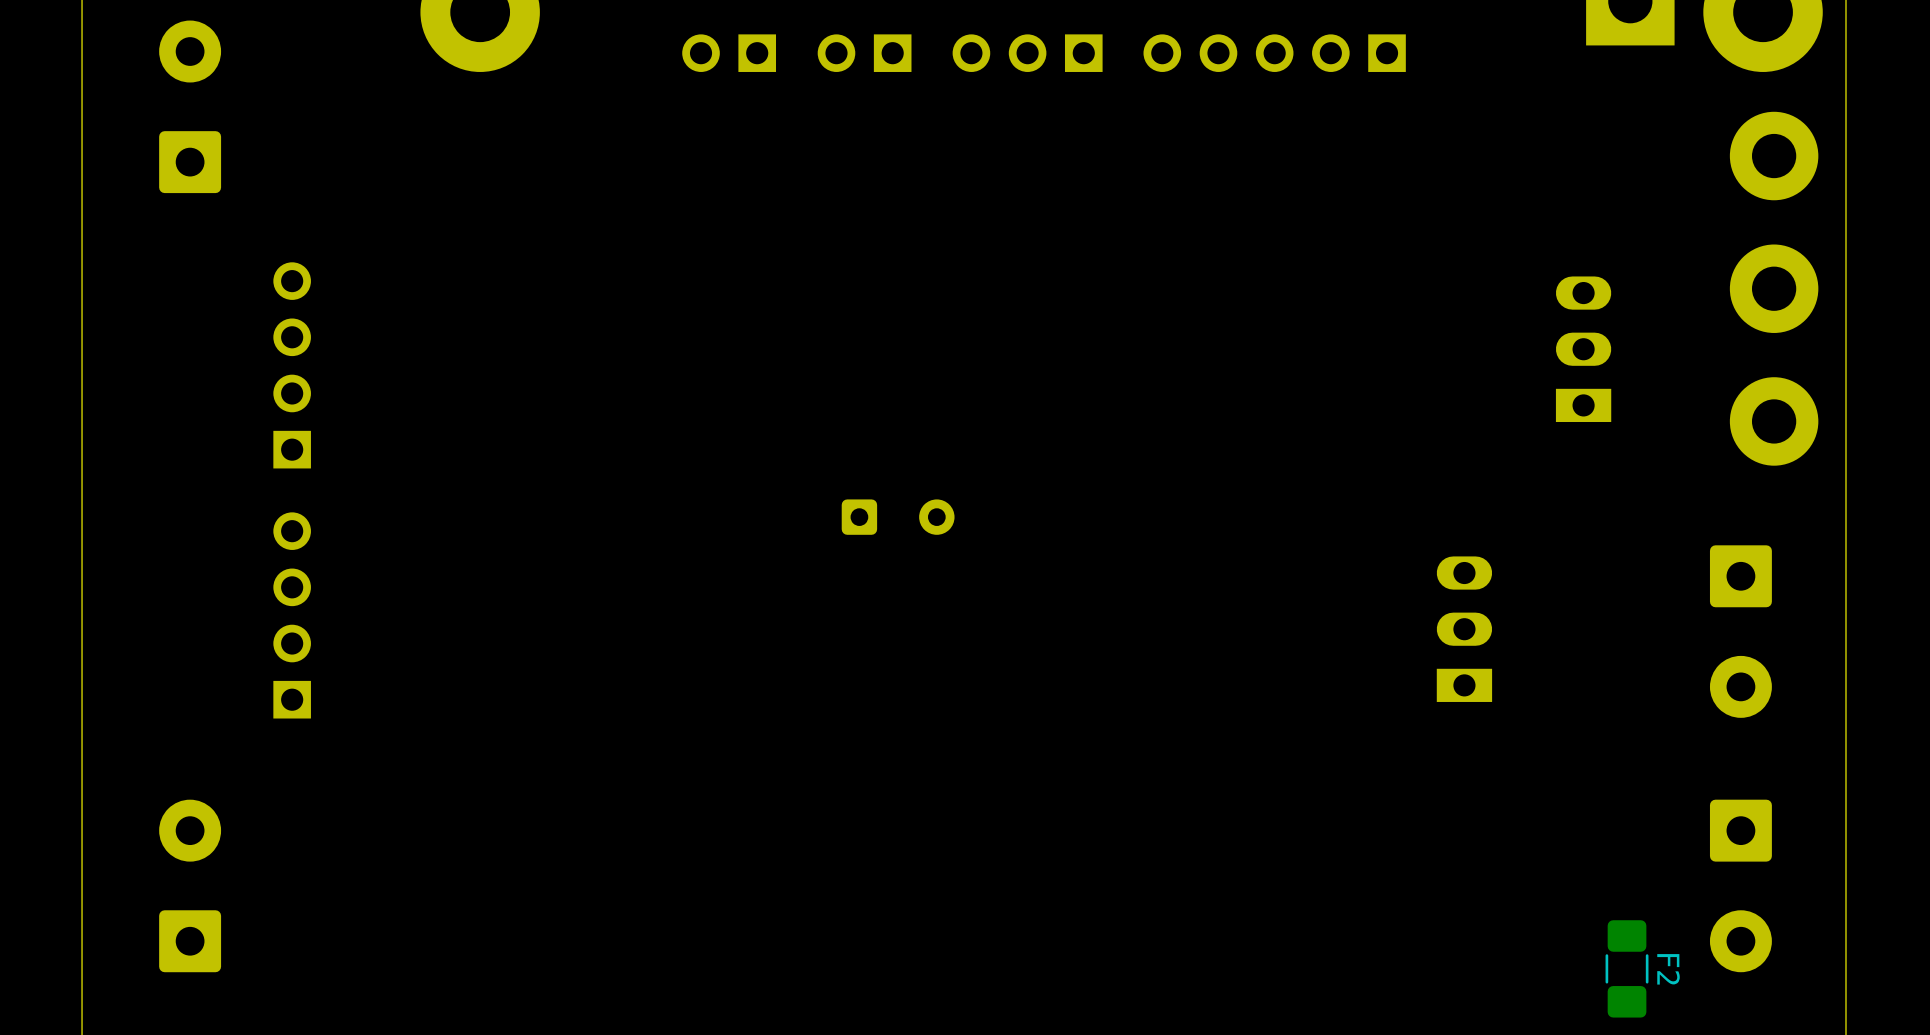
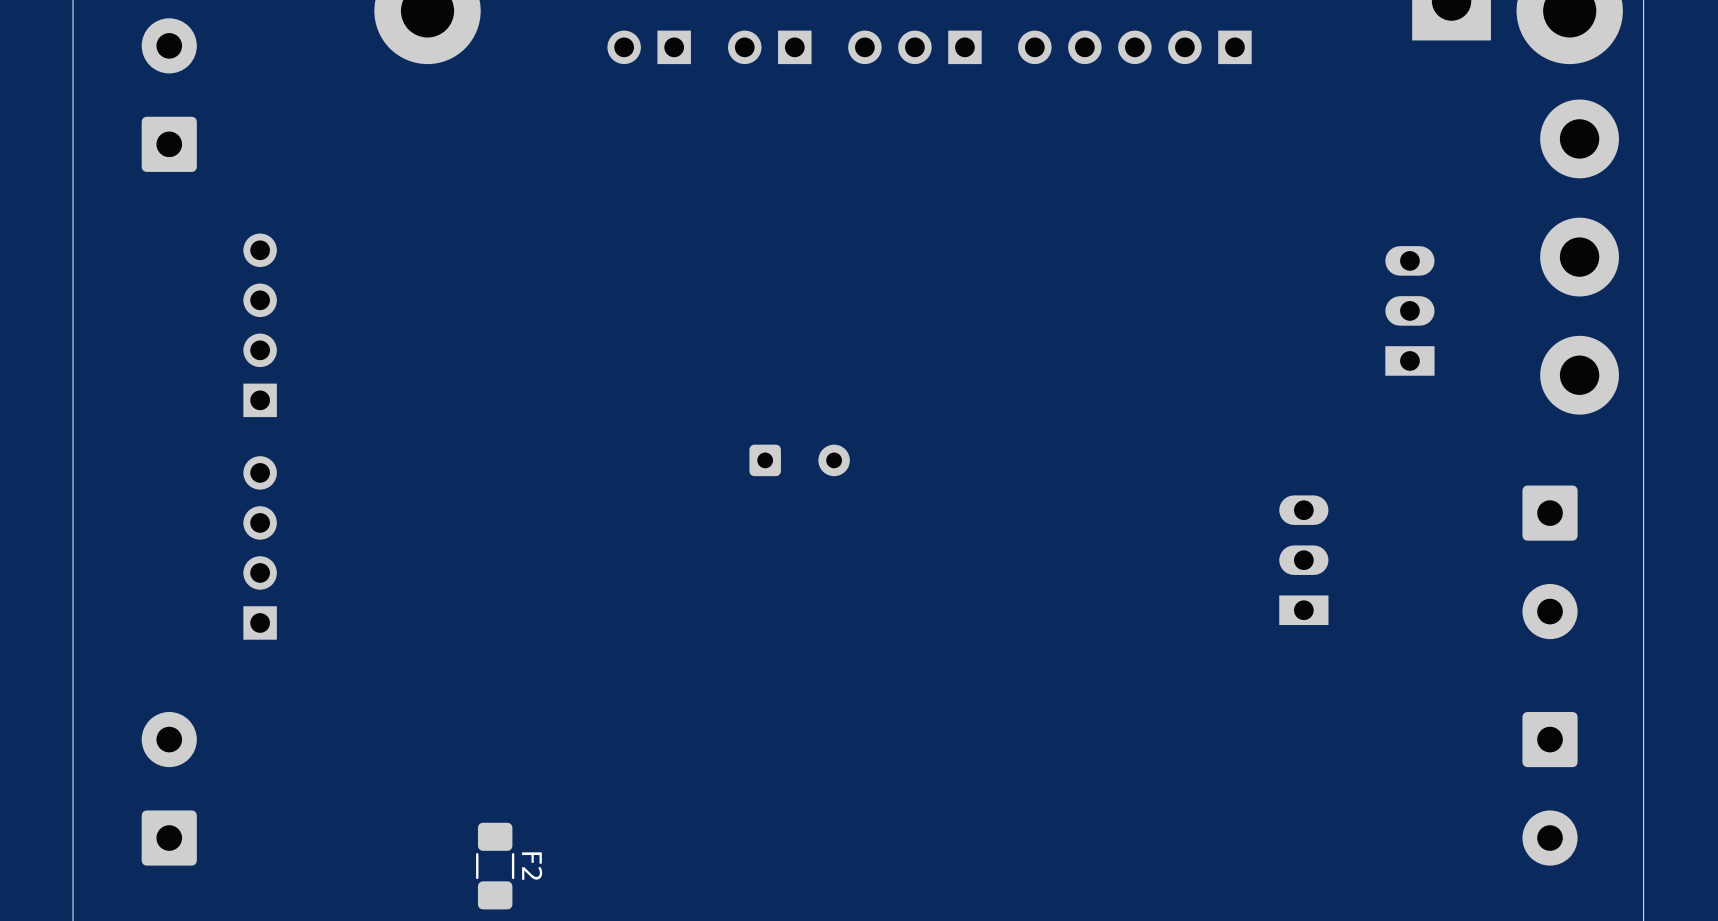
F2 position: (1627, 968) -> (495, 866)

